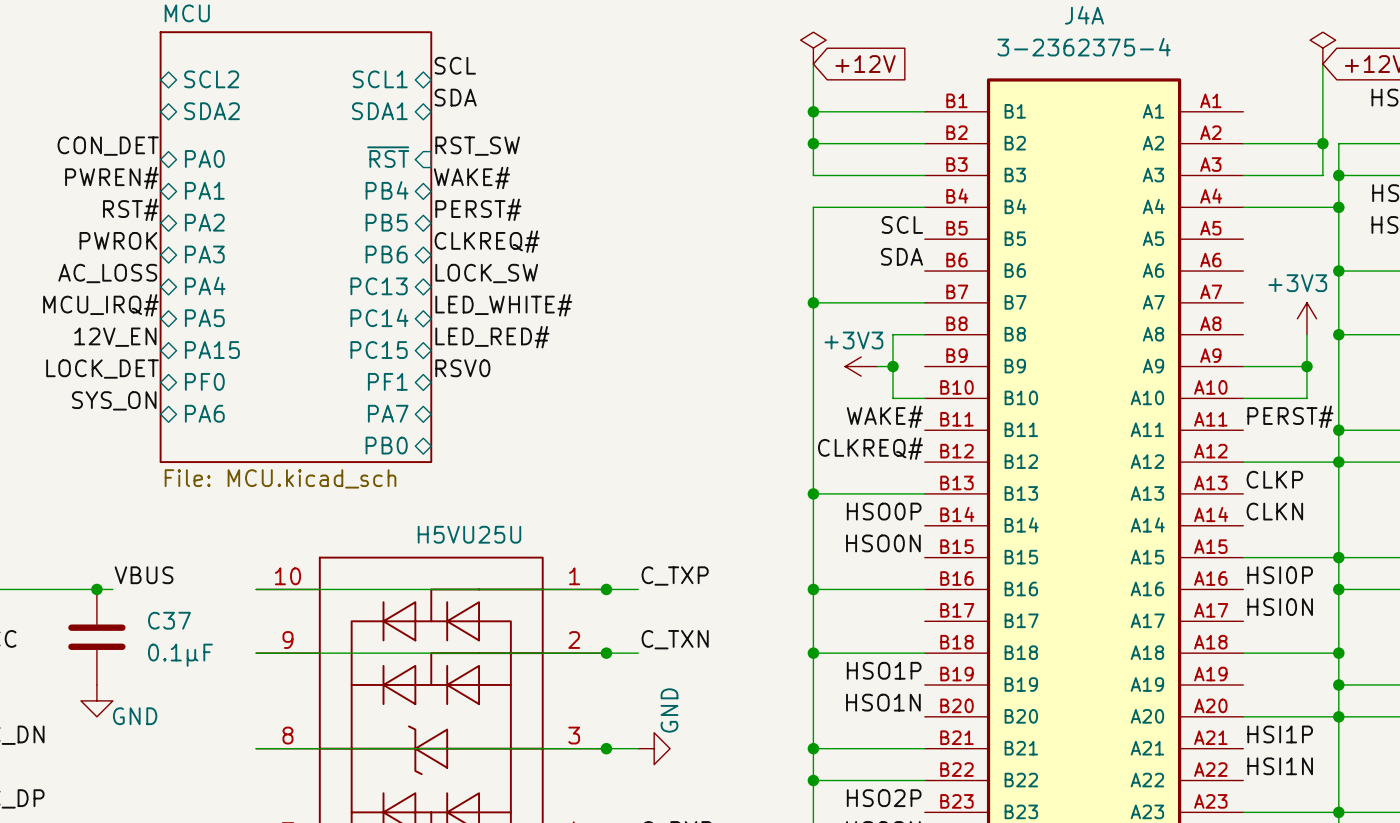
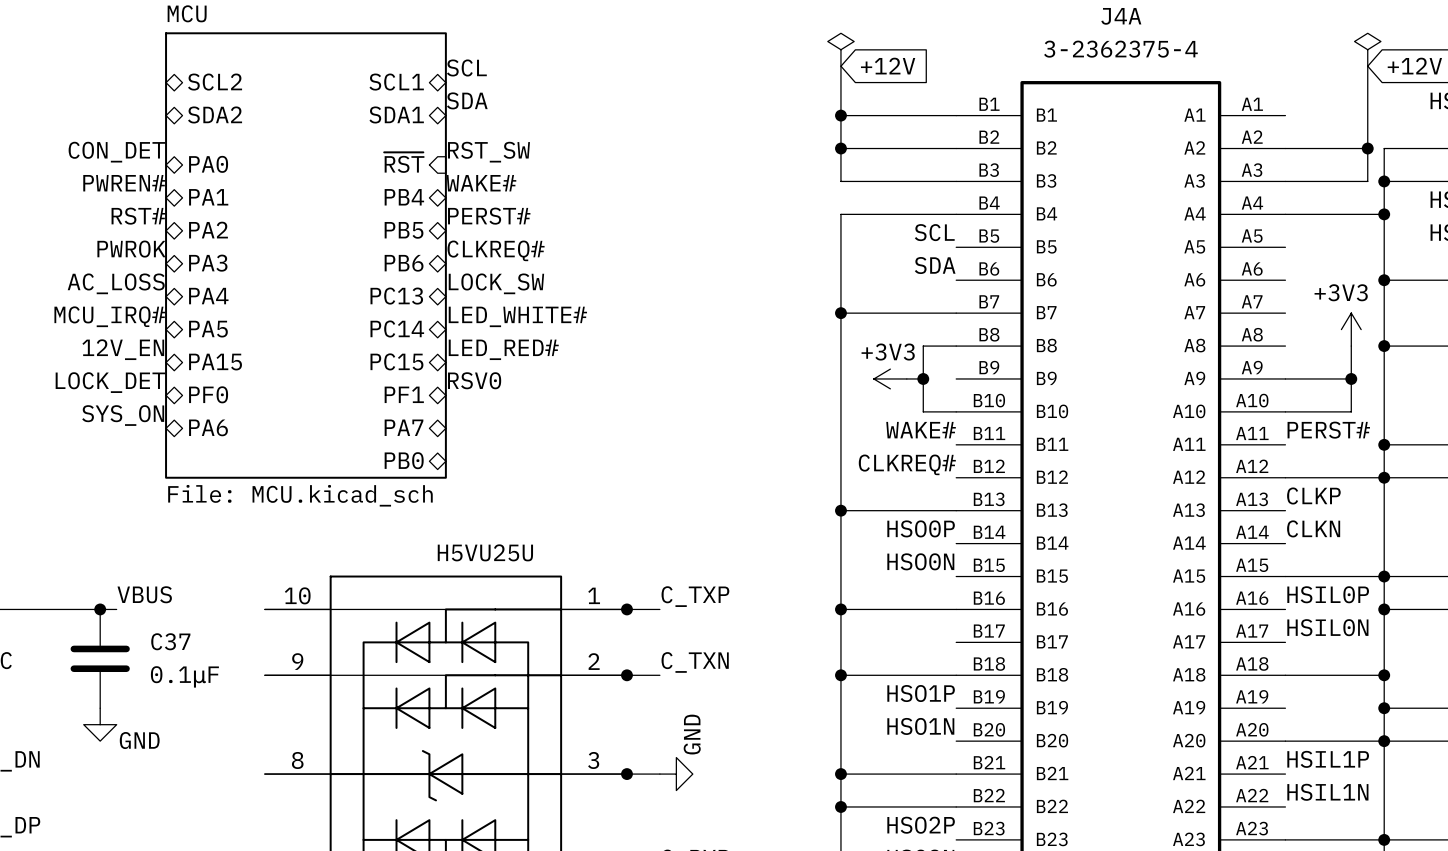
label: HSI0P (1280, 575) -> HSIL0P (1328, 594)
label: HSI0N (1280, 607) -> HSIL0N (1327, 627)
label: HSI1P (1280, 734) -> HSIL1P (1328, 759)
label: HSI1N (1280, 766) -> HSIL1N (1327, 792)

